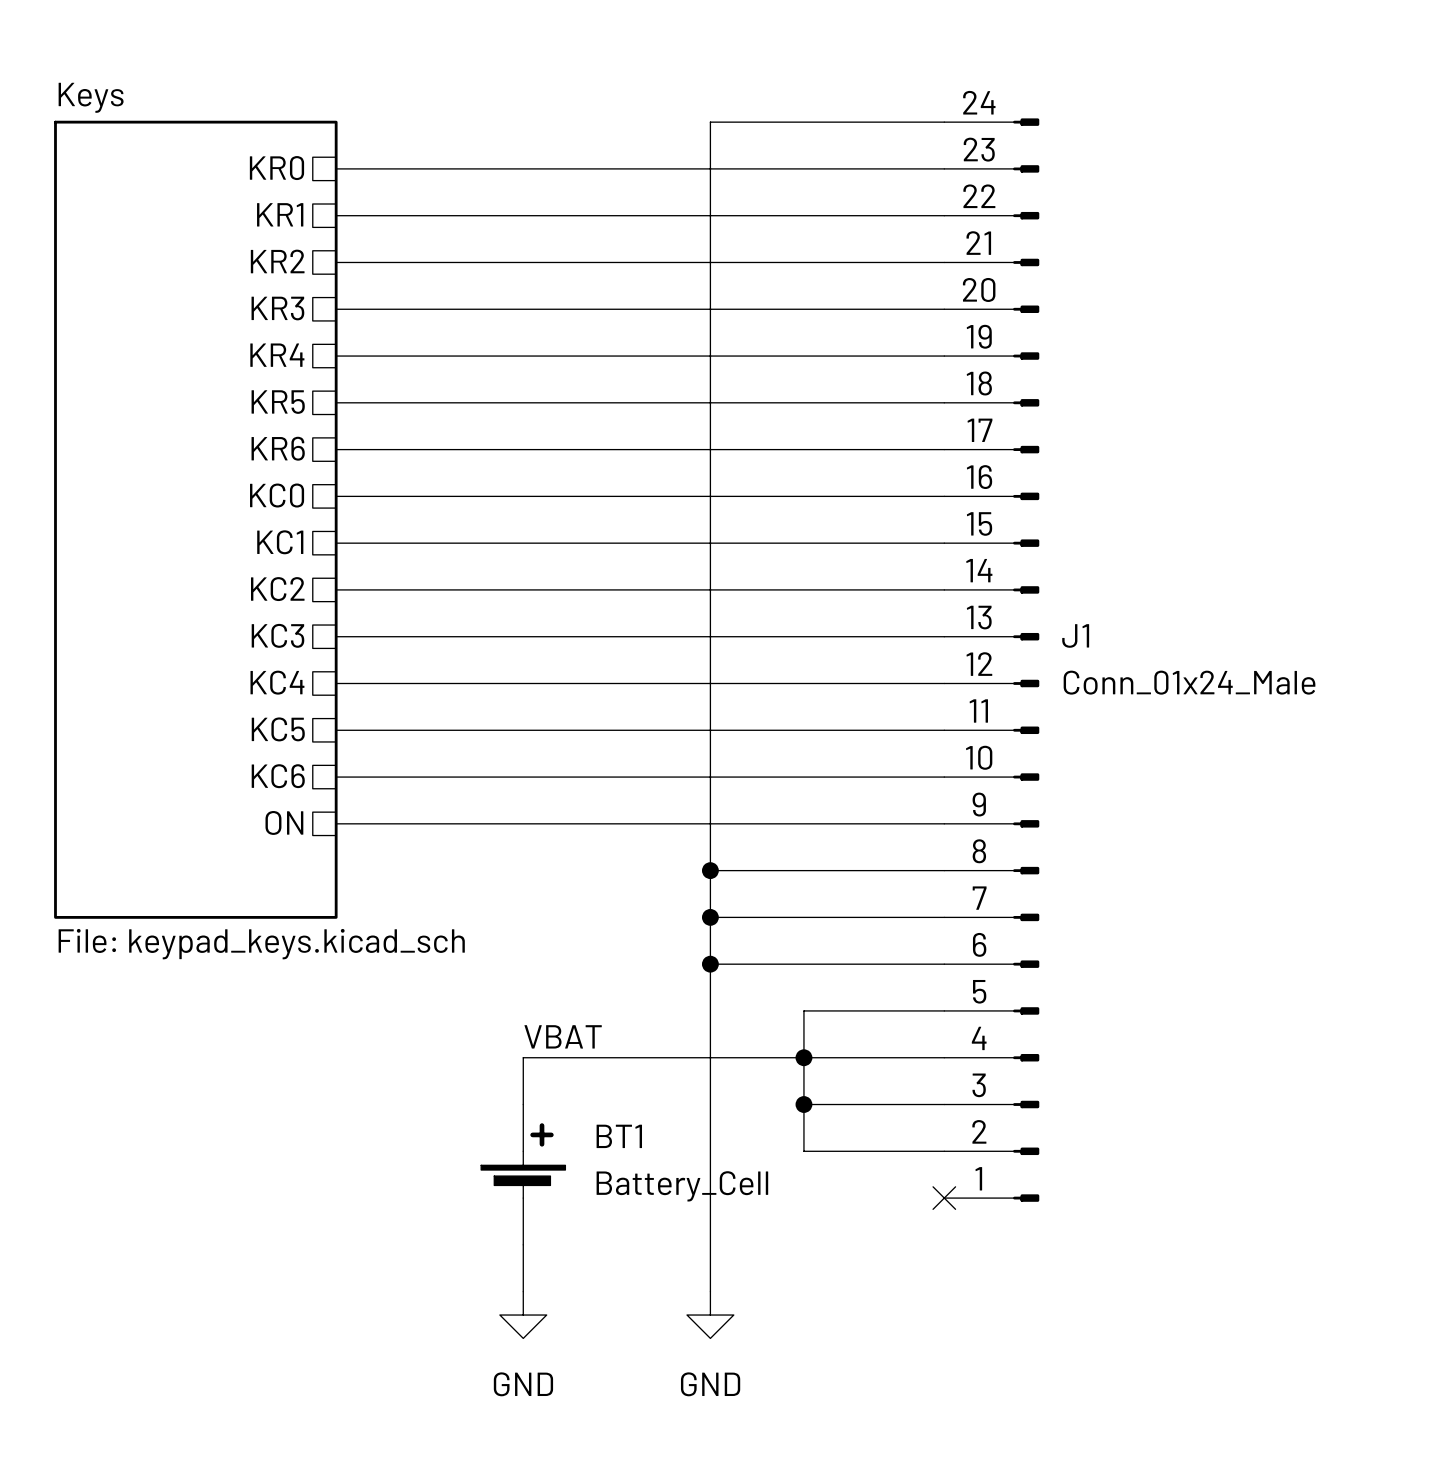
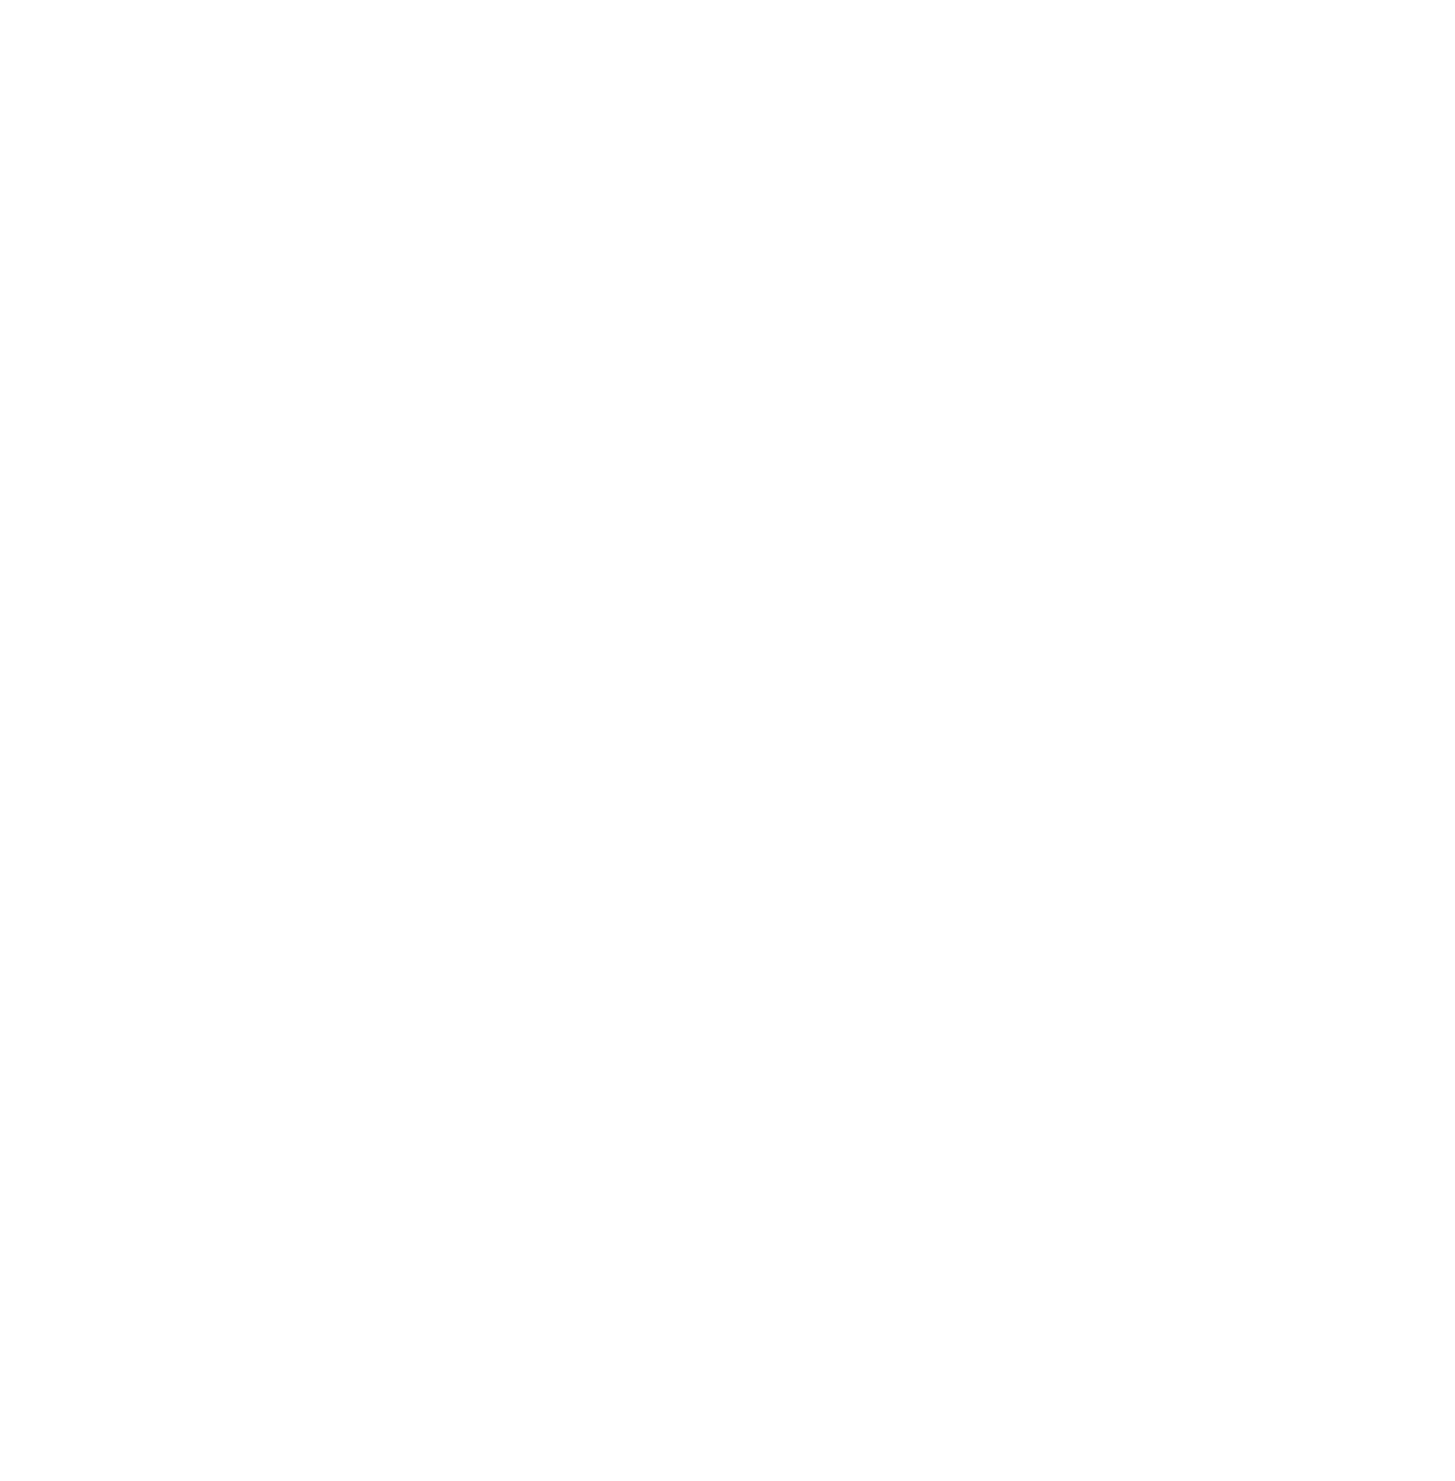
wire: (944, 122) (710, 122) (710, 1291) -> none
sheet pin: KR0 (276, 168) -> none
wire: (336, 168) (944, 168) -> none
sheet pin: KR1 (280, 214) -> none
wire: (336, 215) (944, 215) -> none
sheet pin: KR2 (277, 261) -> none
wire: (336, 262) (944, 262) -> none
sheet pin: KR3 (277, 308) -> none
wire: (336, 309) (944, 309) -> none
sheet pin: KR4 (277, 355) -> none
wire: (336, 356) (944, 356) -> none
sheet pin: KR5 (278, 402) -> none
wire: (336, 402) (944, 402) -> none
sheet pin: KR6 (278, 448) -> none
wire: (336, 449) (944, 449) -> none
sheet pin: KC0 (277, 495) -> none
wire: (336, 496) (944, 496) -> none
sheet Keys: File: keypad_keys.kicad_sch (195, 519) -> none
sheet pin: KC1 (280, 542) -> none
wire: (336, 543) (944, 543) -> none
sheet pin: KC2 (277, 589) -> none
wire: (336, 589) (944, 589) -> none
sheet pin: KC3 (277, 635) -> none
wire: (336, 636) (944, 636) -> none
J1: Conn_01x24_Male (991, 660) -> none
sheet pin: KC4 (277, 682) -> none
wire: (336, 683) (944, 683) -> none
sheet pin: KC5 (278, 729) -> none
wire: (336, 730) (944, 730) -> none
sheet pin: KC6 (278, 776) -> none
wire: (336, 777) (944, 777) -> none
sheet pin: ON (284, 822) -> none
wire: (336, 823) (944, 823) -> none
wire: (710, 870) (944, 870) -> none
junction: (710, 870) -> none
wire: (710, 917) (944, 917) -> none
junction: (710, 917) -> none
wire: (710, 964) (944, 964) -> none
junction: (710, 964) -> none
wire: (944, 1010) (803, 1010) (803, 1151) (944, 1151) -> none
label: VBAT (563, 1036) -> none
junction: (803, 1057) -> none
wire: (944, 1057) (523, 1057) (523, 1104) -> none
wire: (803, 1104) (944, 1104) -> none
junction: (803, 1104) -> none
BT1: Battery_Cell (523, 1174) -> none
no-connect mark: (944, 1198) -> none
wire: (523, 1244) (523, 1291) -> none
power symbol: GND (523, 1315) -> none
power symbol: GND (710, 1315) -> none

